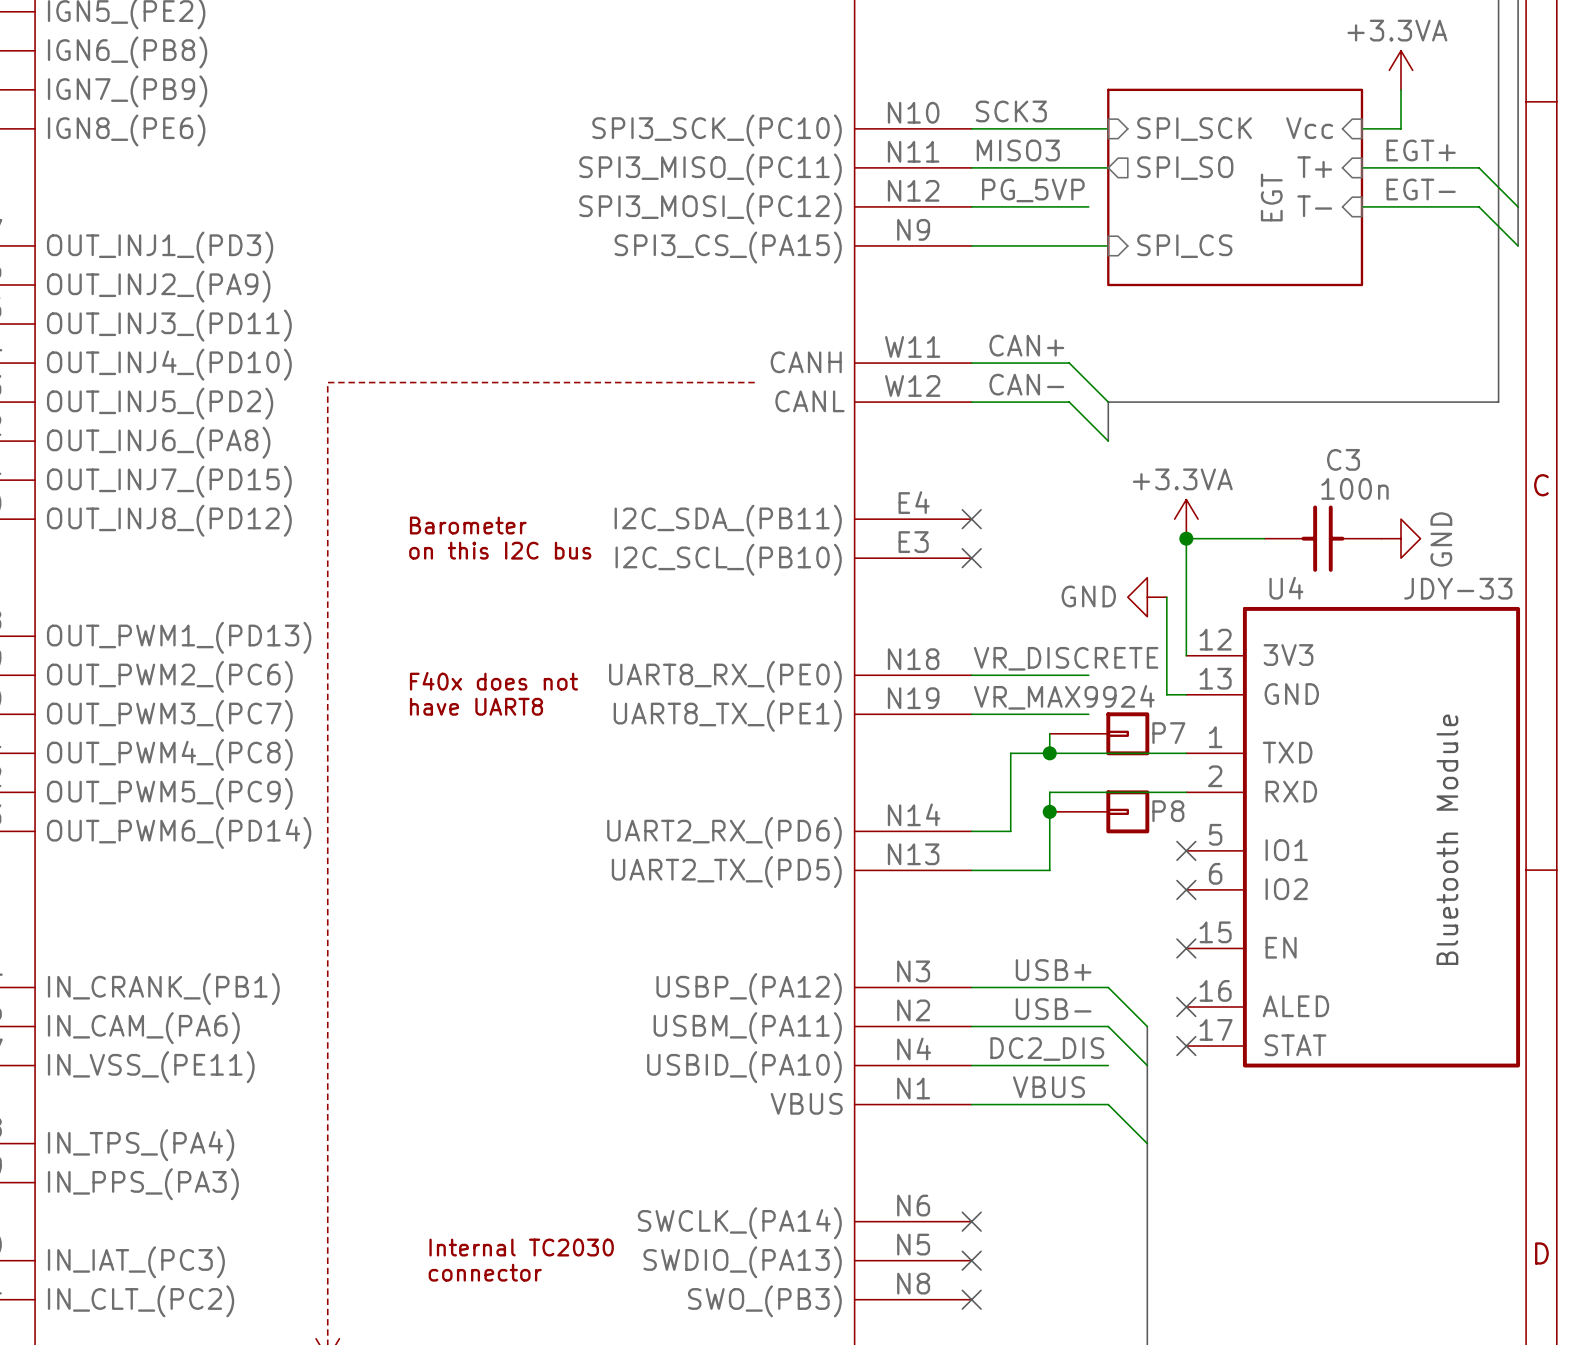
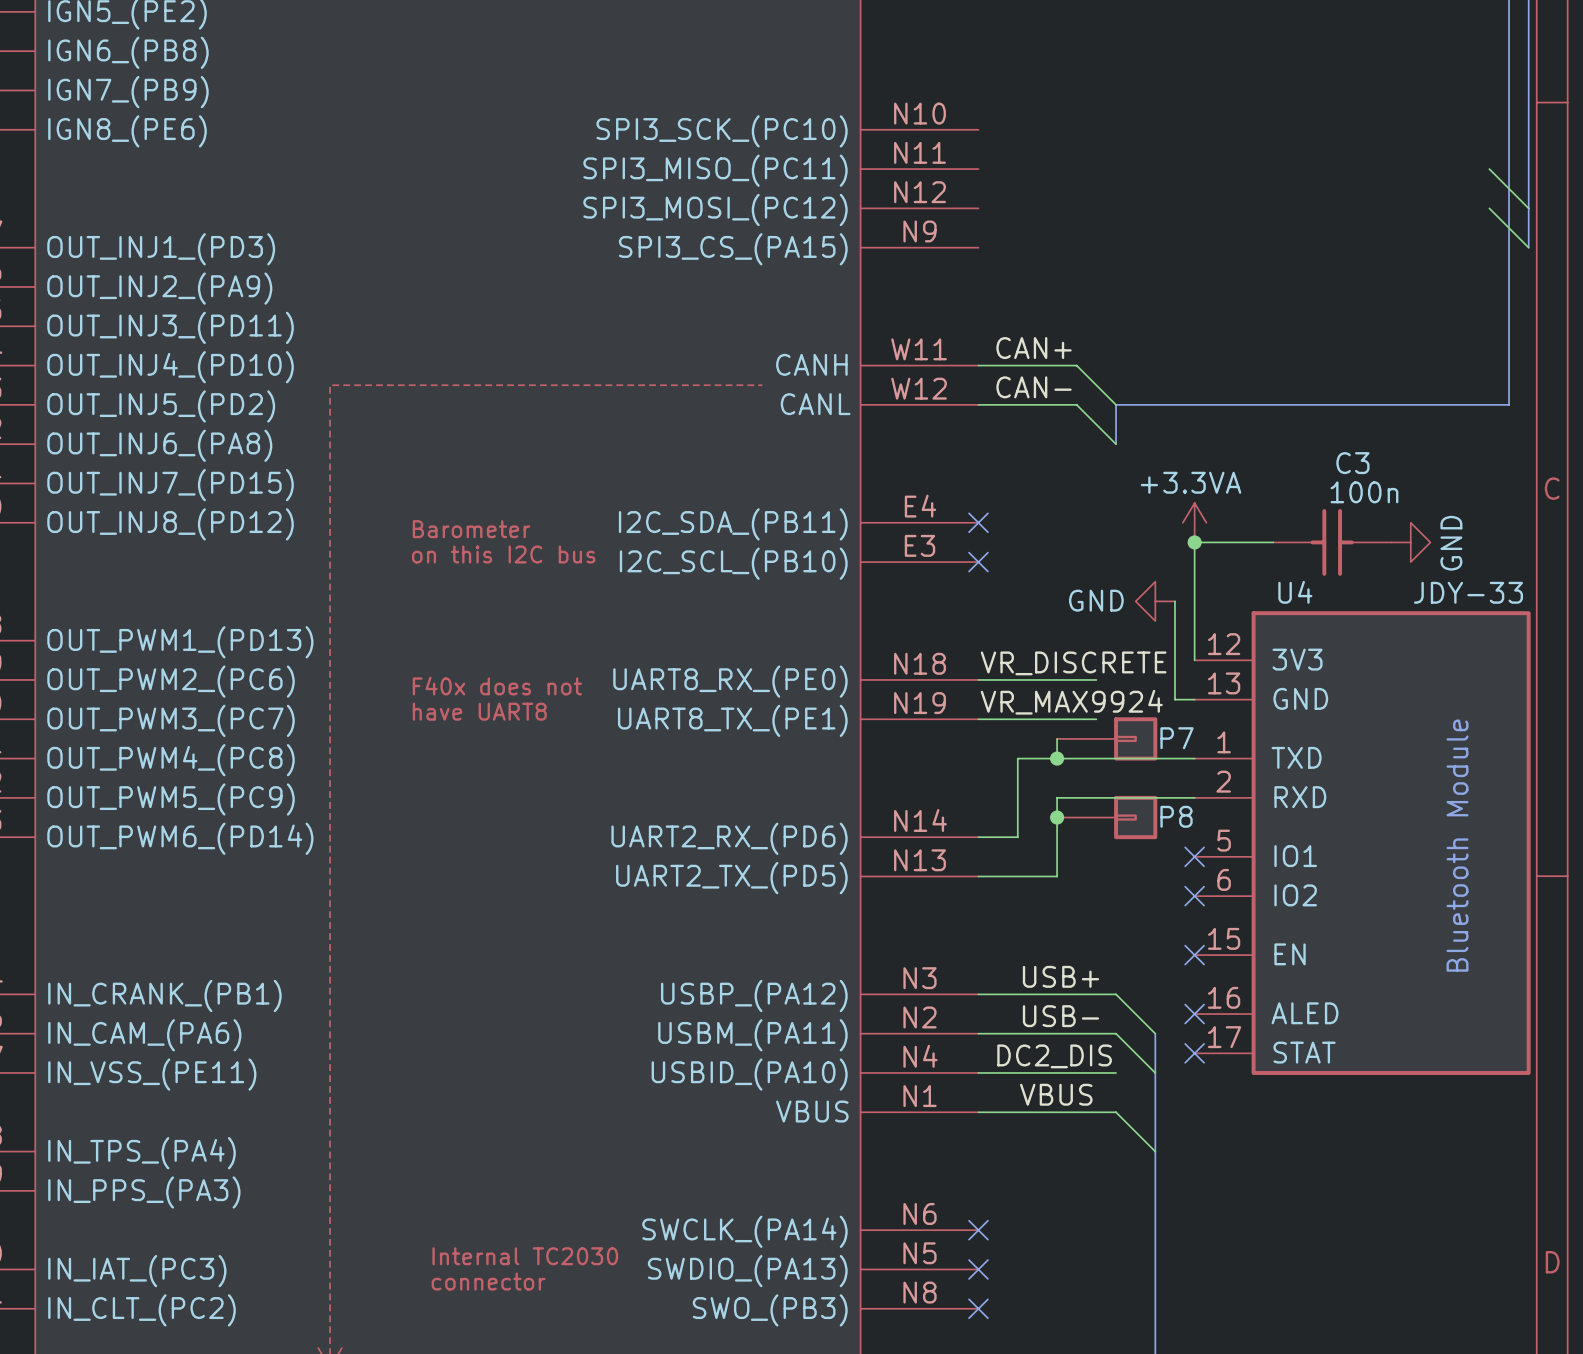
power symbol: +3.3VA (1401, 70) -> none
wire: (1401, 89) (1401, 128) (1361, 128) -> none
label: SCK3 (1011, 111) -> none
wire: (971, 128) (1108, 128) -> none
sheet pin: Vcc (1309, 128) -> none
sheet pin: SPI_SCK (1194, 129) -> none
label: MISO3 (1018, 150) -> none
label: EGT+ (1421, 150) -> none
wire: (971, 167) (1108, 167) -> none
sheet pin: T+ (1314, 167) -> none
wire: (1361, 167) (1479, 167) -> none
sheet pin: SPI_SO (1185, 168) -> none
sheet EGT: (1235, 187) -> none
label: EGT- (1421, 189) -> none
label: PG_5VP (1033, 190) -> none
wire: (971, 206) (1088, 206) -> none
sheet pin: T- (1314, 206) -> none
wire: (1361, 206) (1479, 206) -> none
wire: (971, 245) (1108, 245) -> none
sheet pin: SPI_CS (1184, 246) -> none

